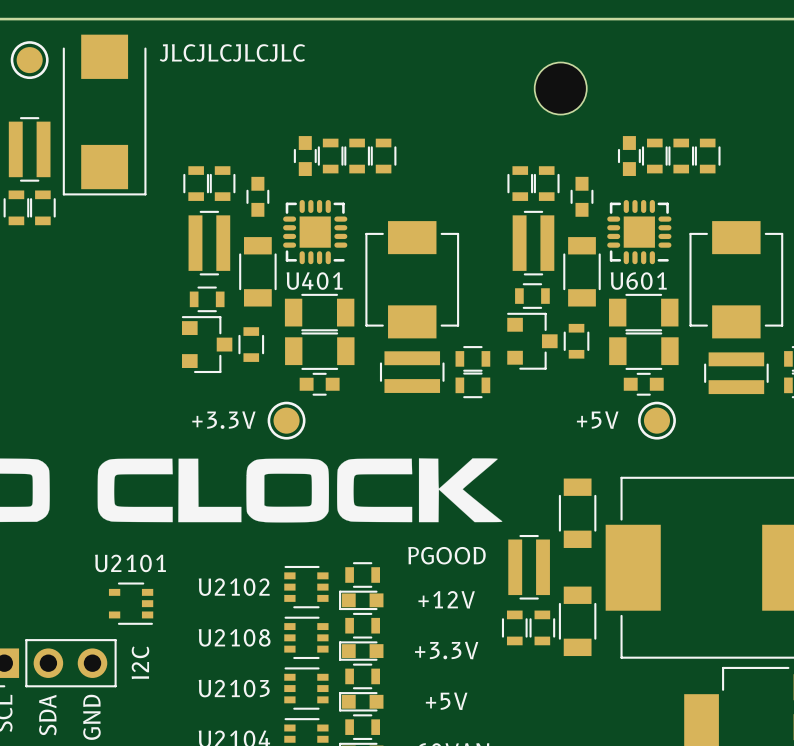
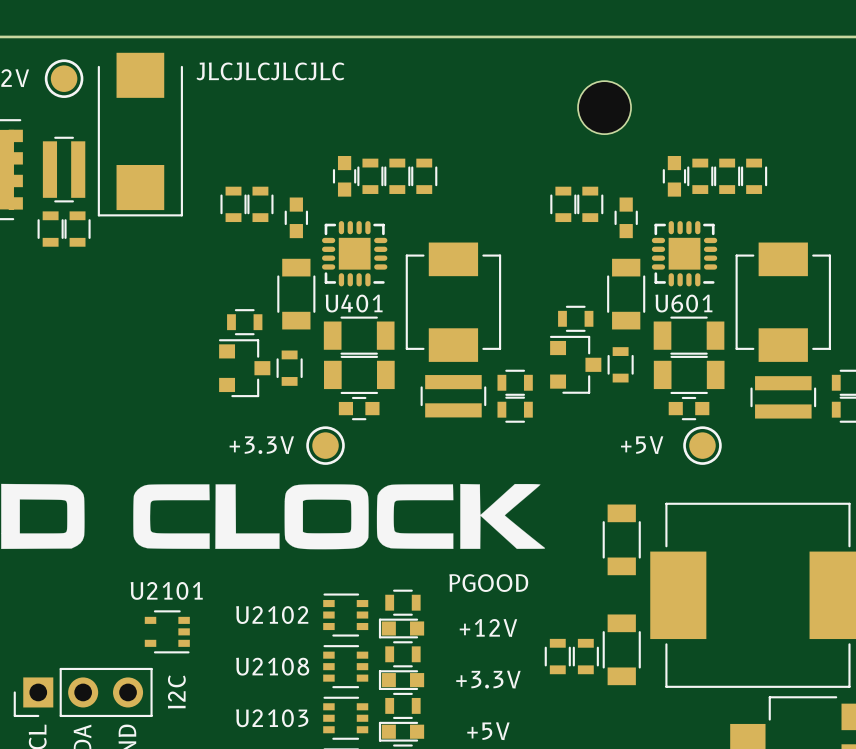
part: (209, 243) -> none
part: (533, 243) -> none
part: (529, 567) -> none

